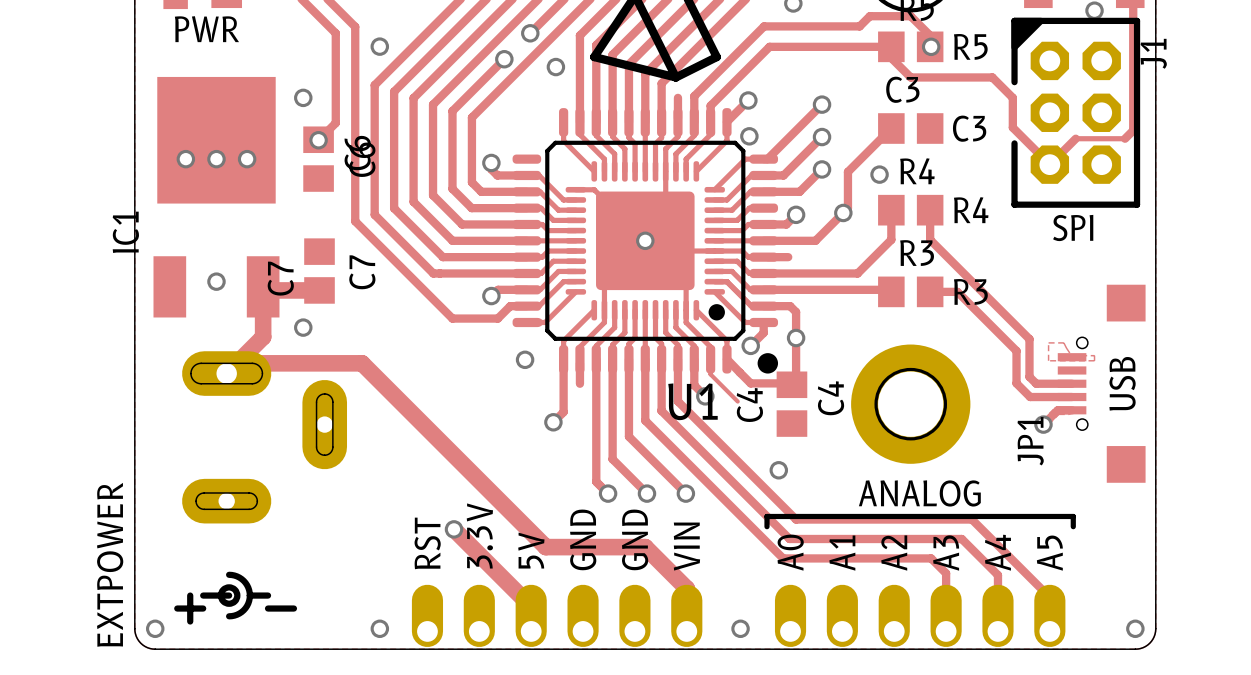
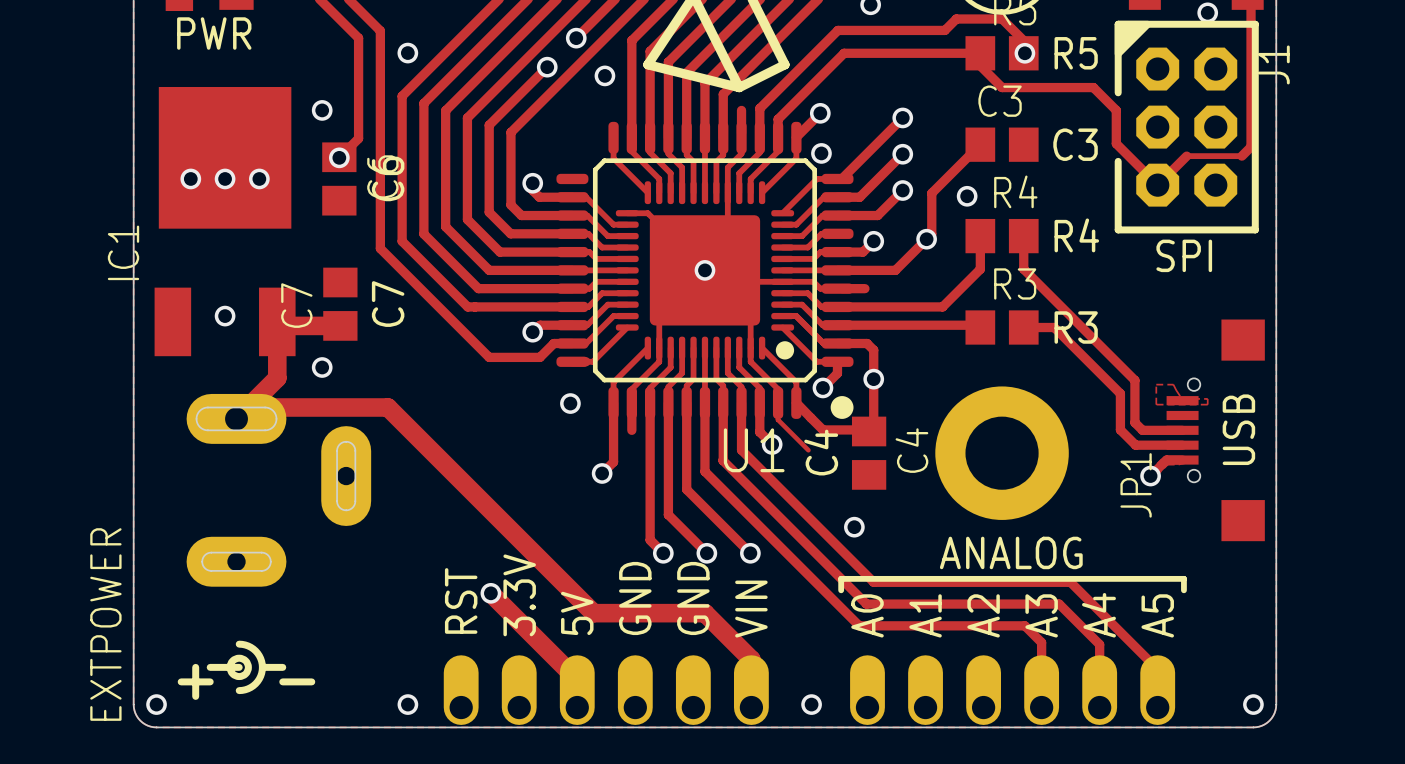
part footprint: [851, 344, 971, 464] -> [935, 386, 1069, 520]

